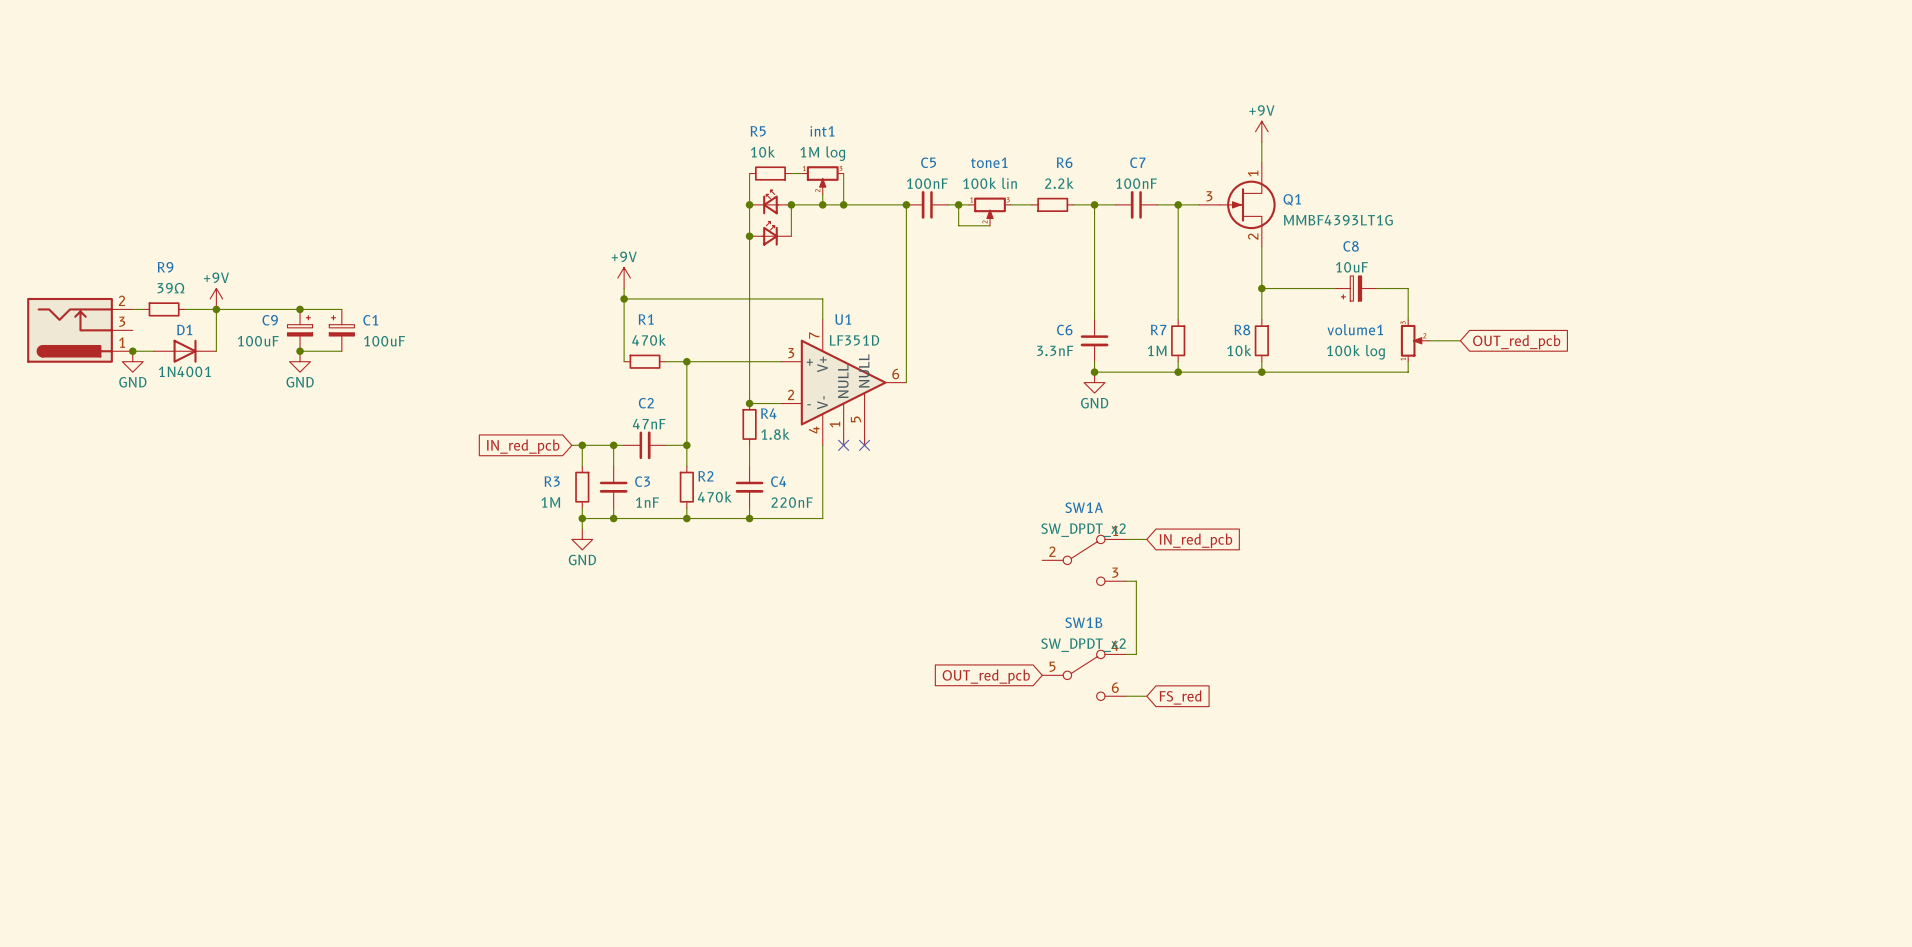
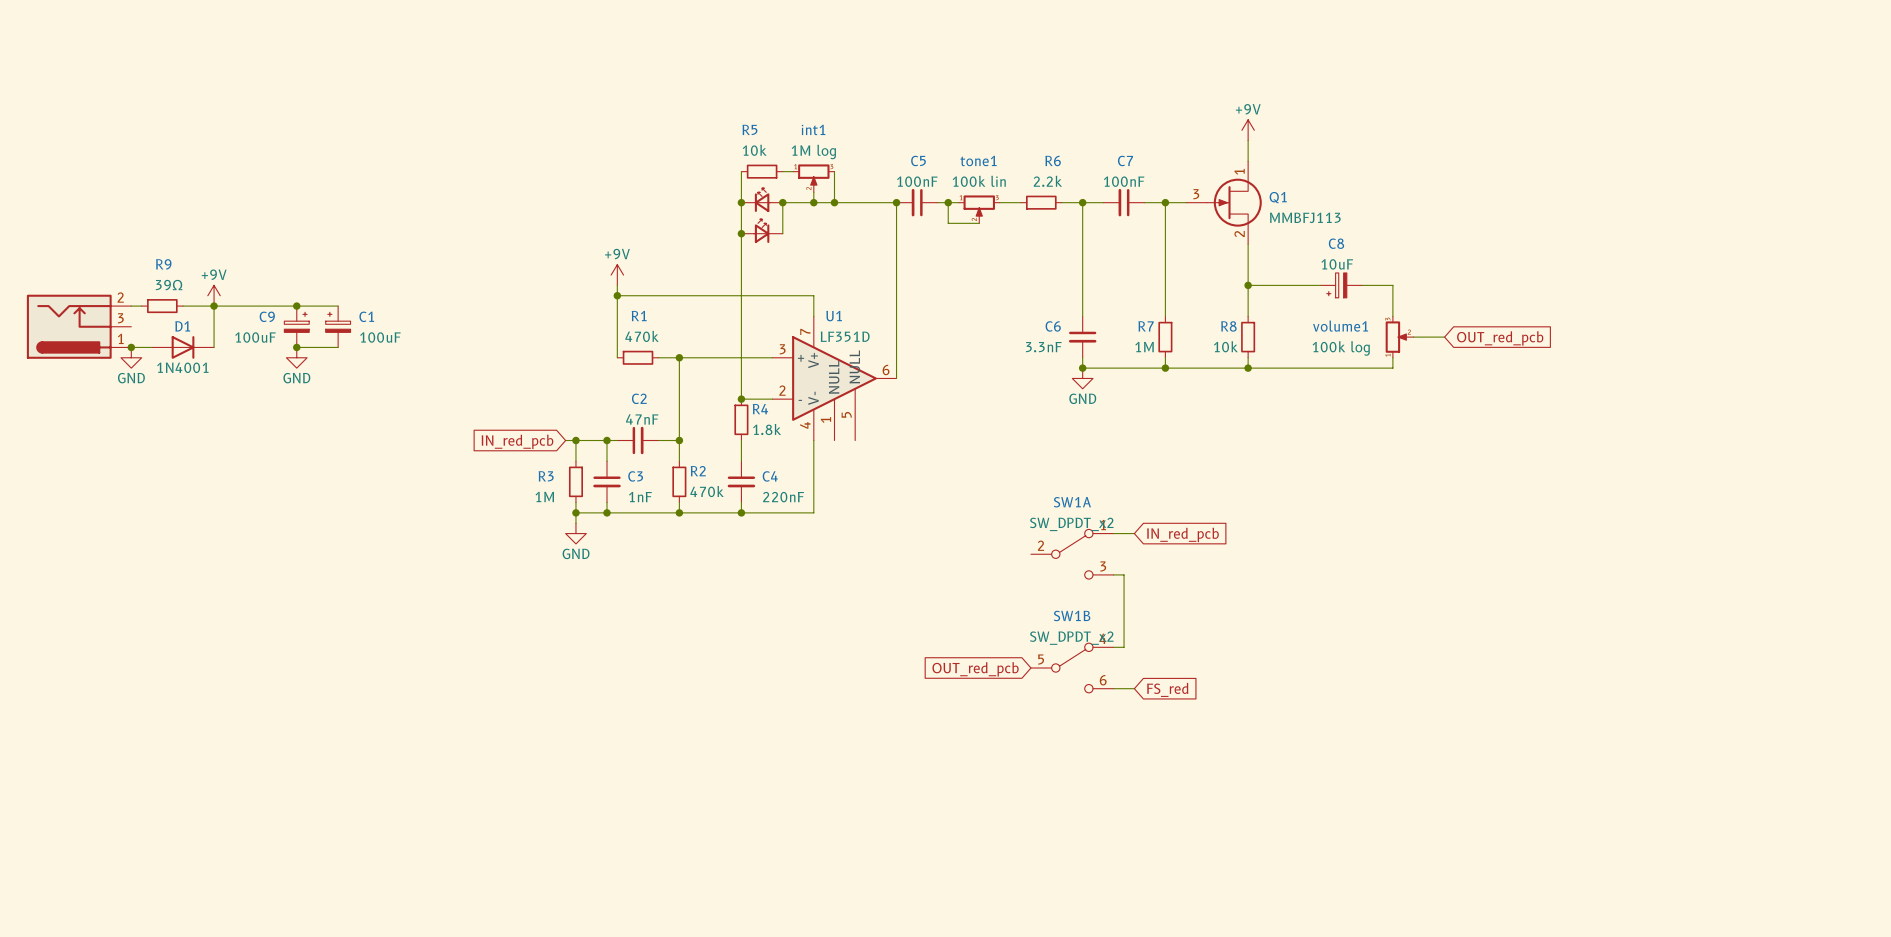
Q1 value: MMBF4393LT1G (1338, 220) -> MMBFJ113 (1305, 217)
no-connect mark: (843, 445) -> none
no-connect mark: (864, 445) -> none

